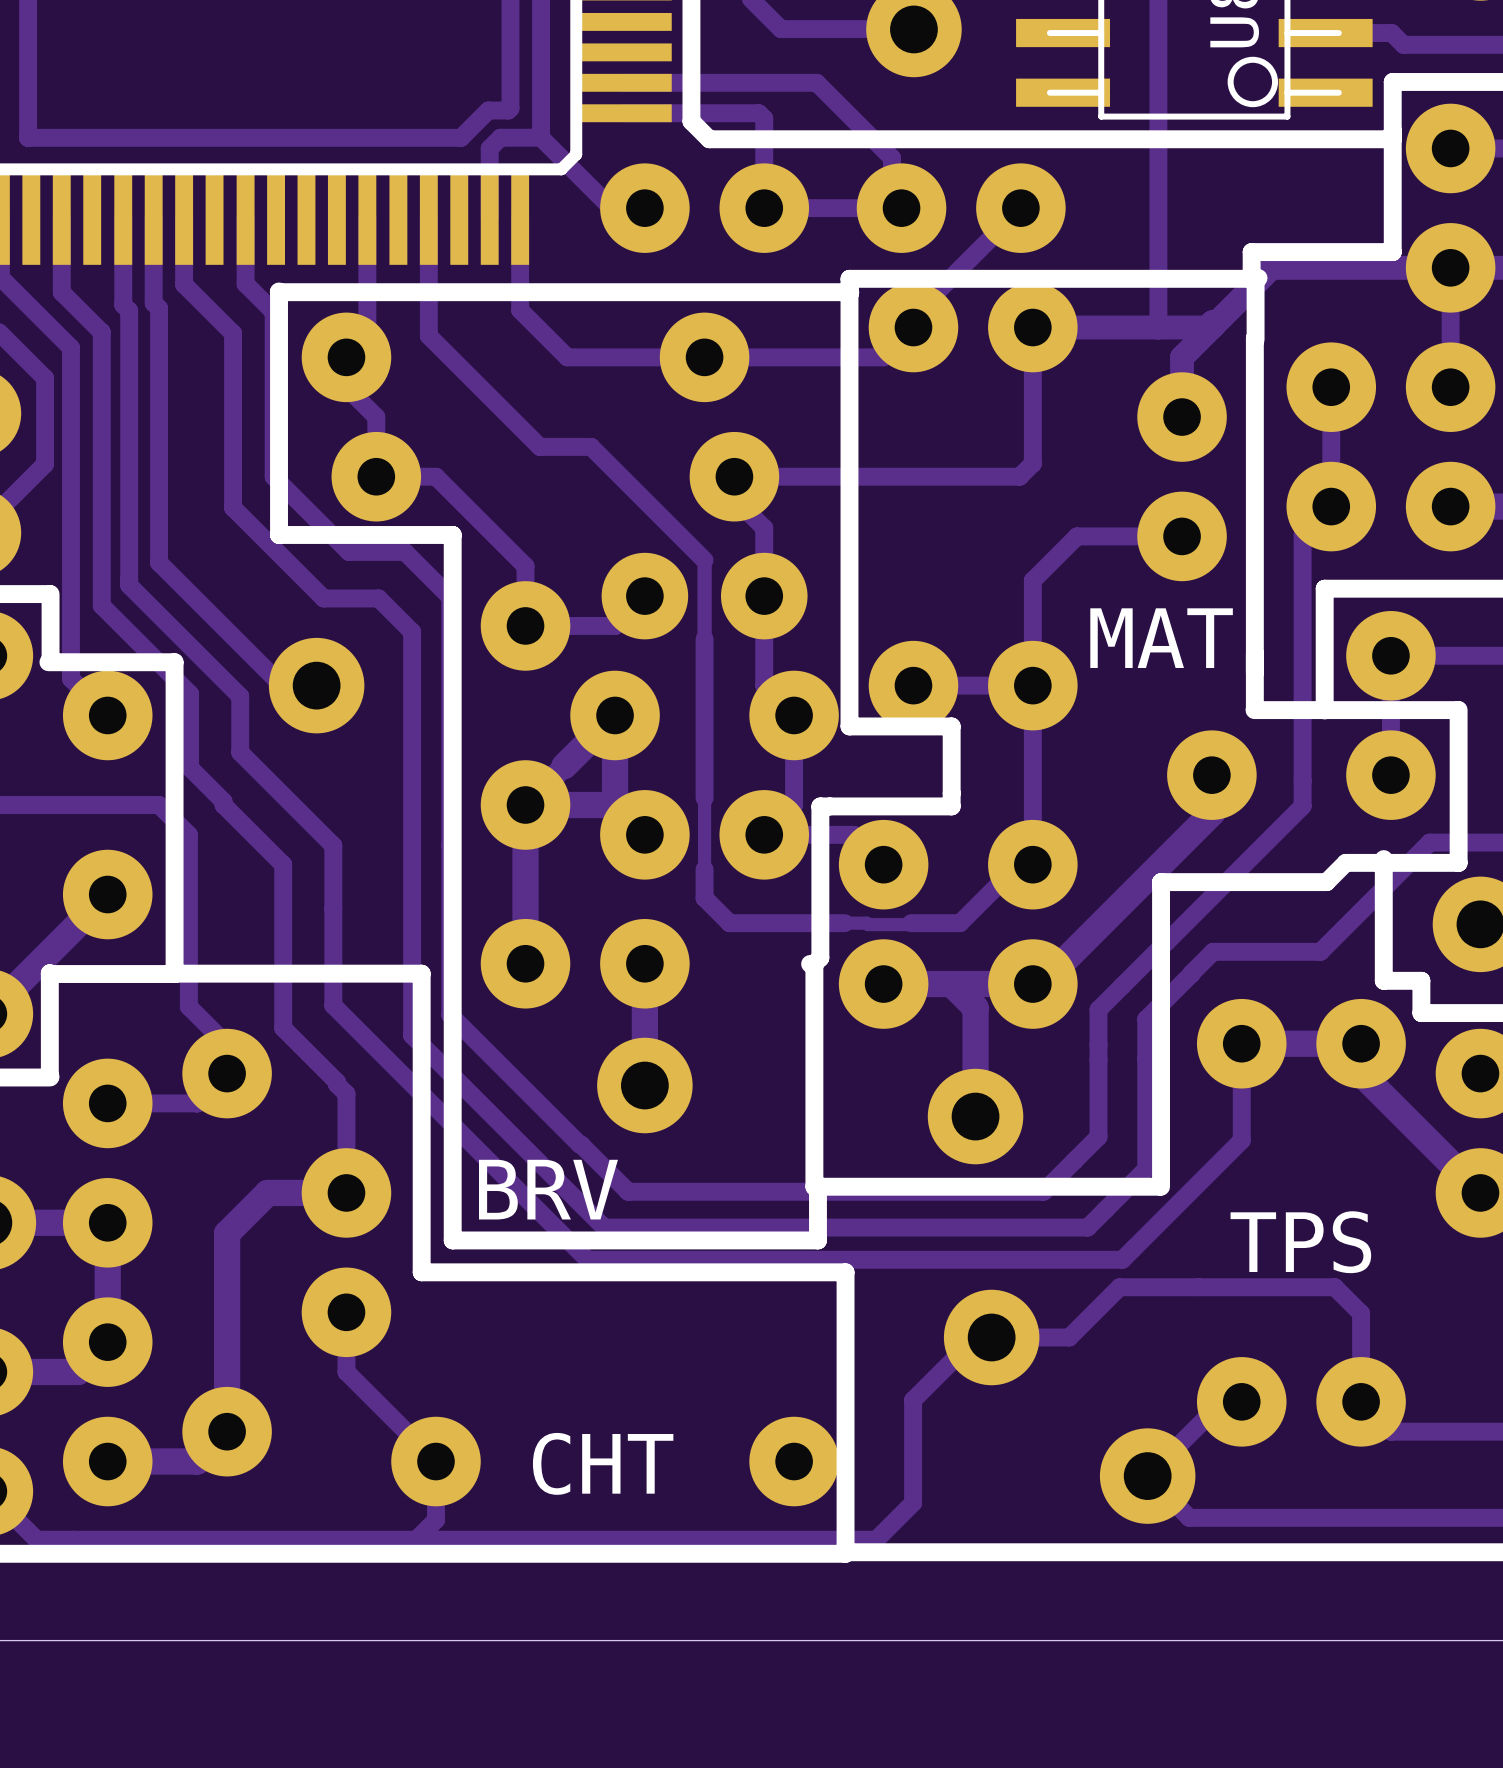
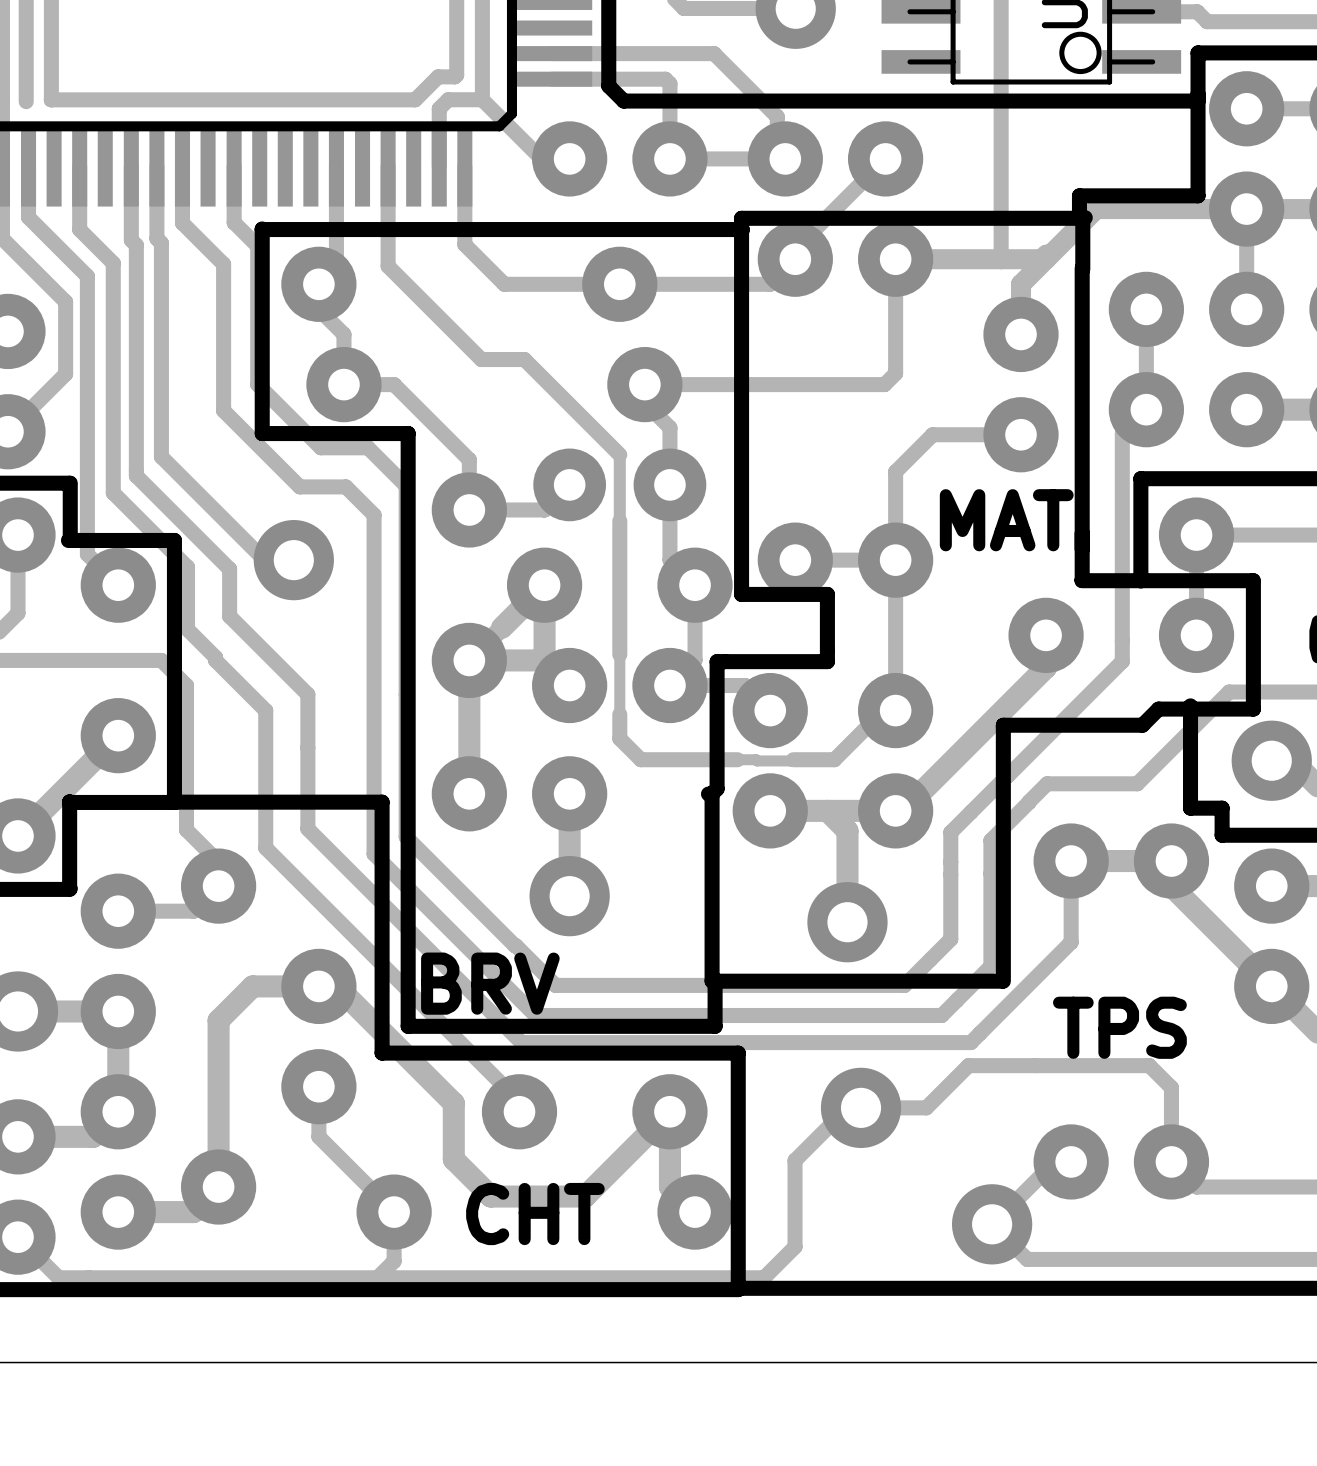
track: (336, 1081) (346, 1093) (346, 1192) -> (310, 893) (519, 1101) (519, 1111)
track: none -> (318, 986) (336, 986) (453, 1103) (453, 1159) (490, 1196) (585, 1196) (669, 1111) (669, 1187)
part: none -> (594, 1111)

